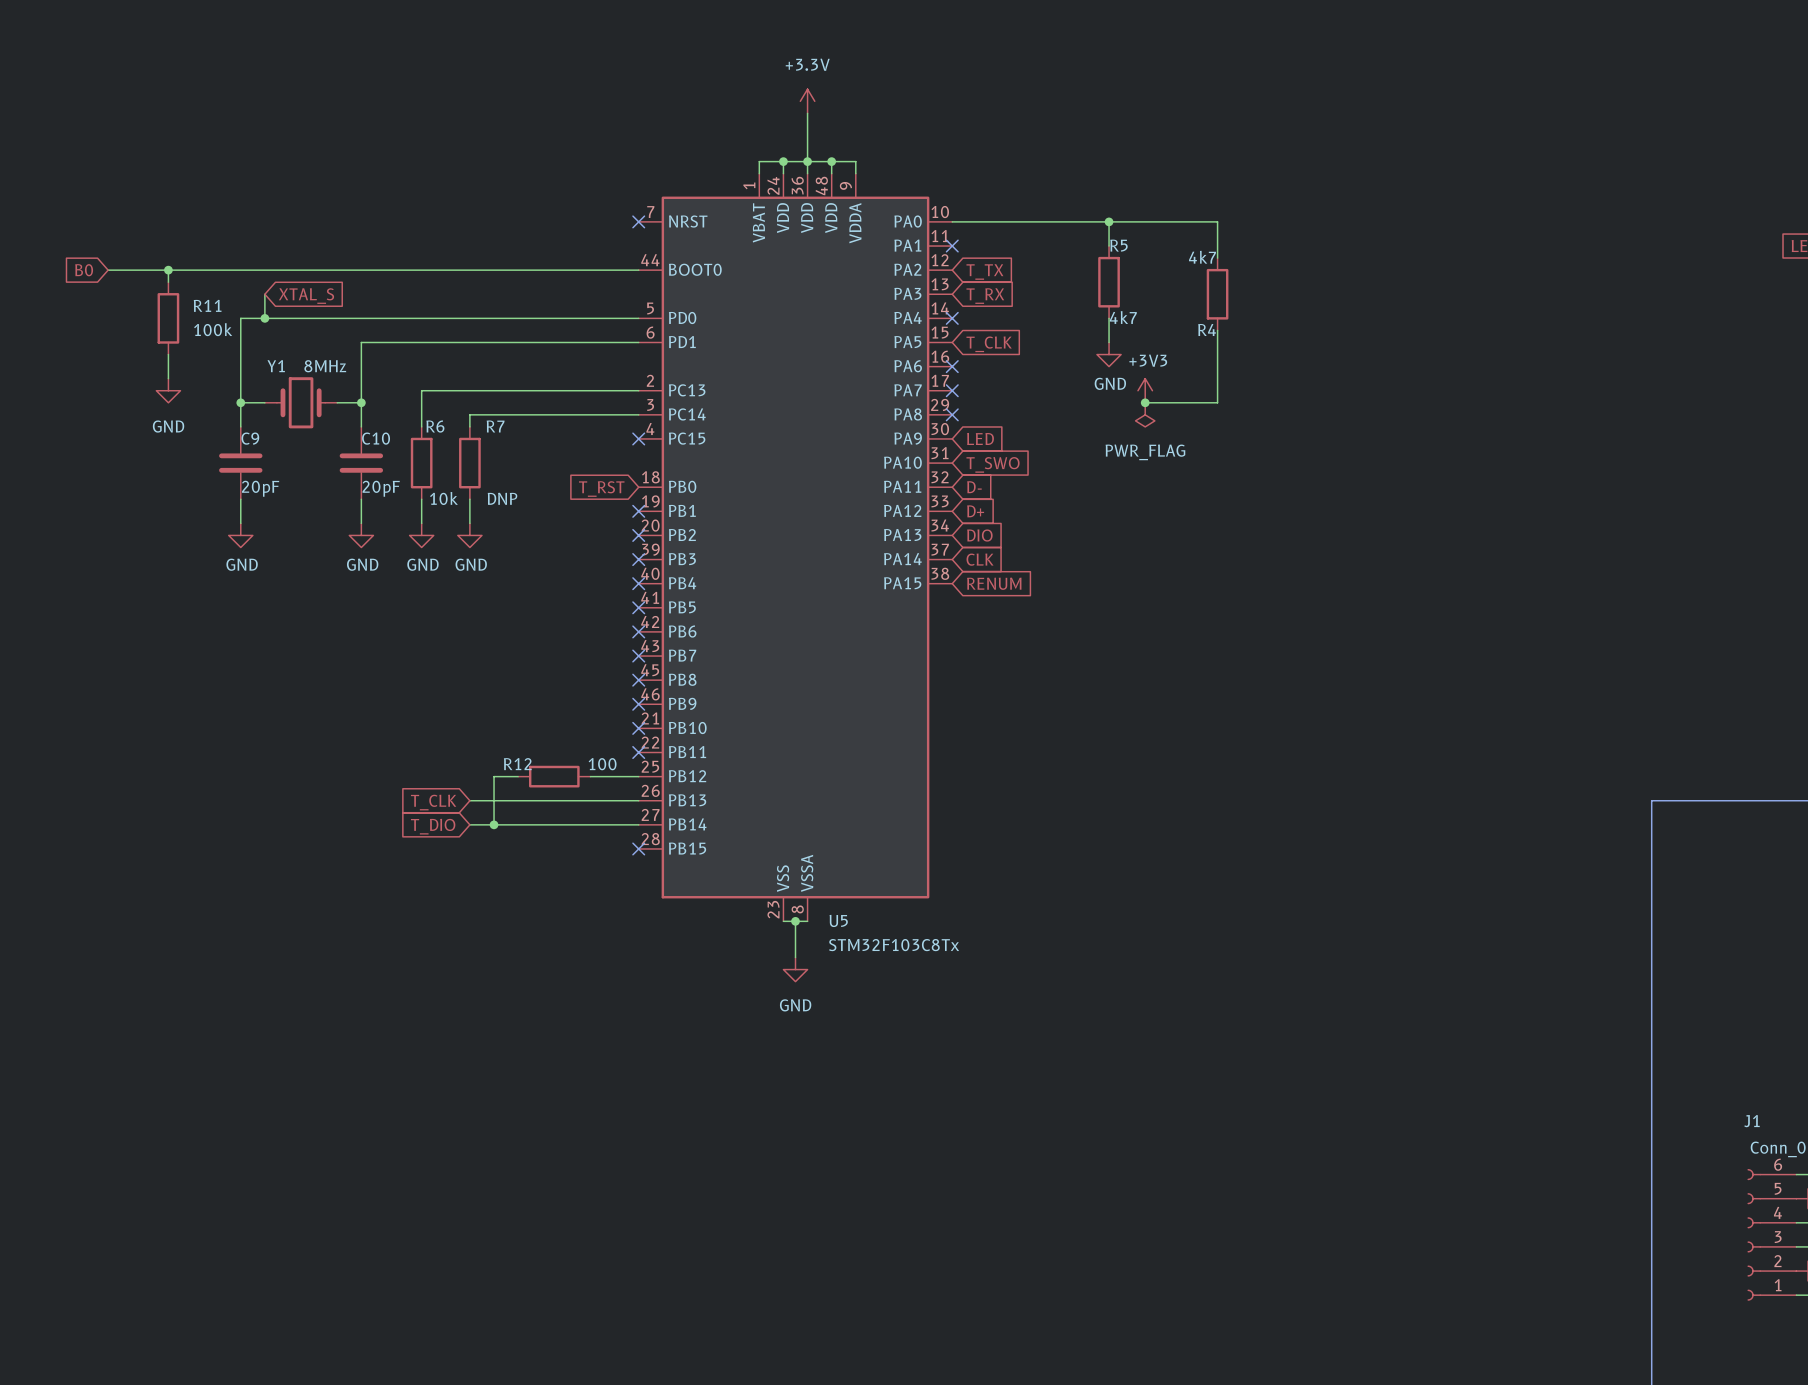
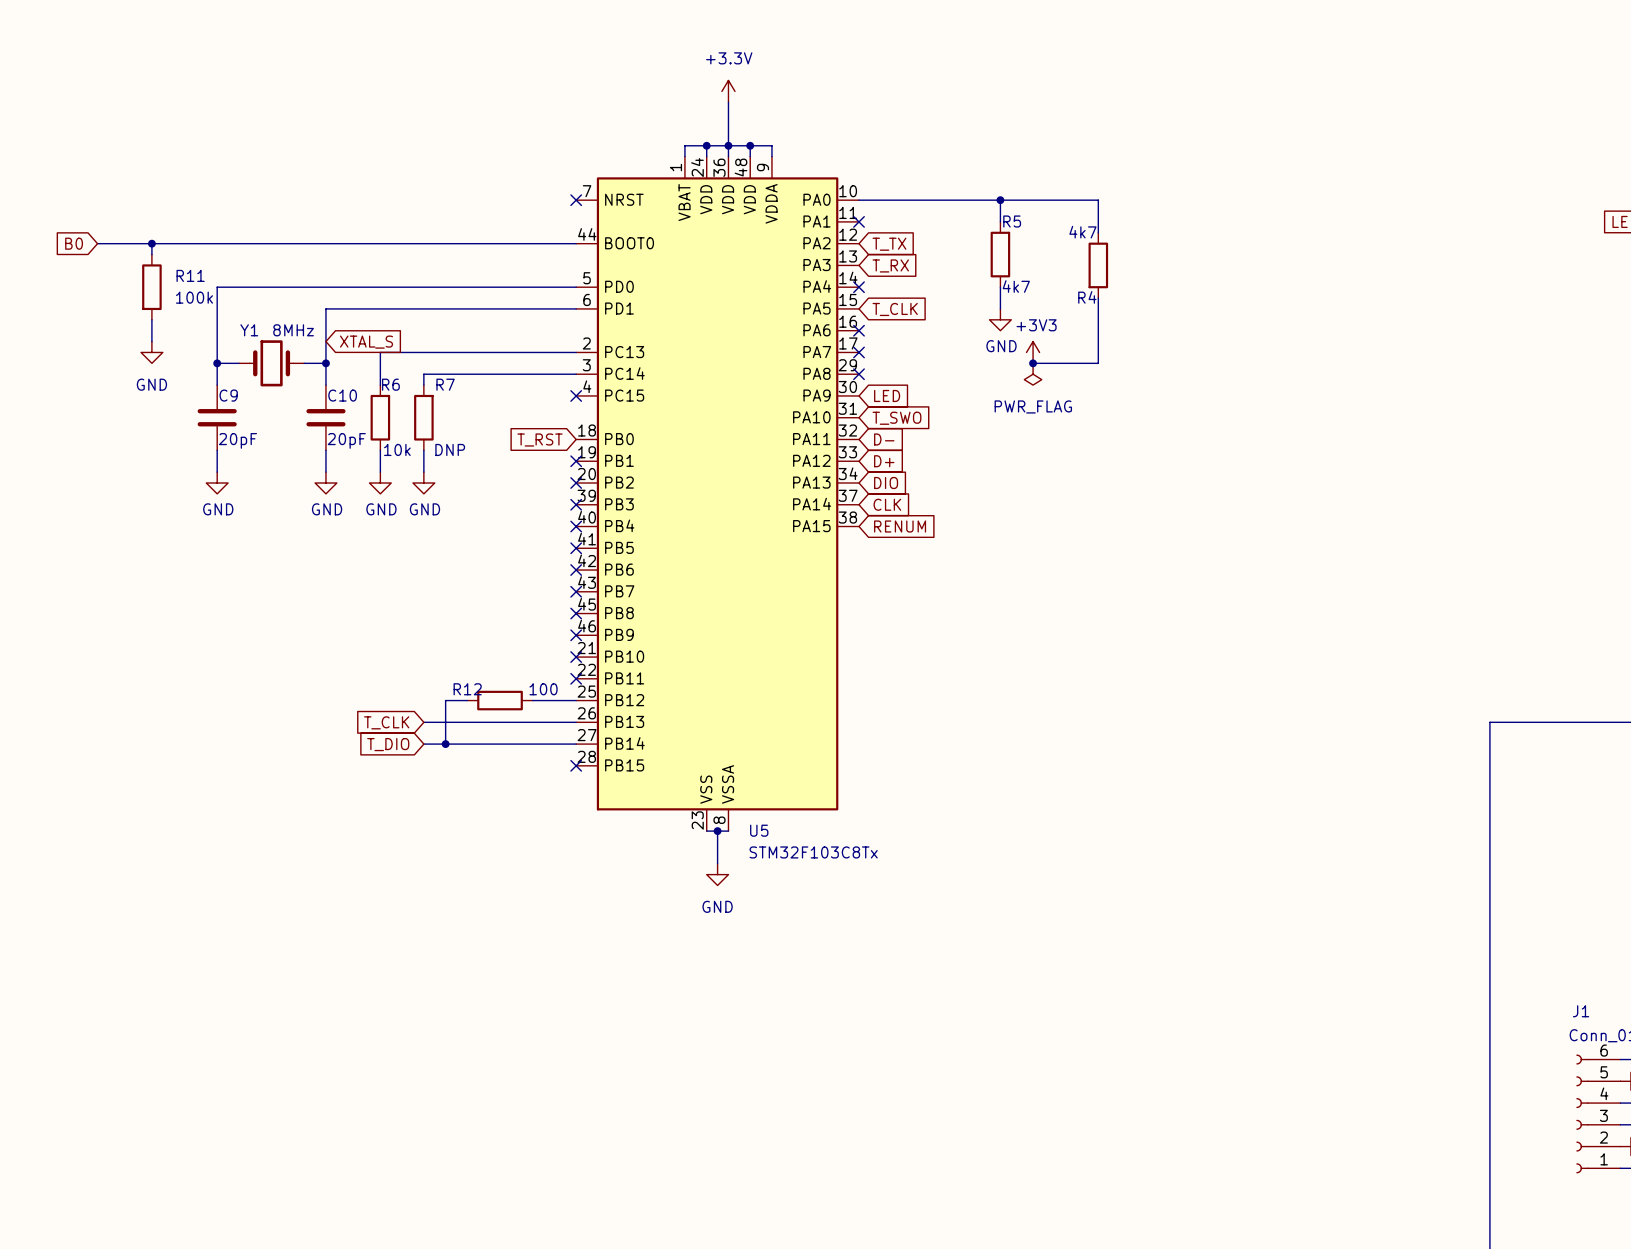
wire: (264, 294) (264, 318) -> none
global label position: XTAL_S (306, 296) -> XTAL_S (366, 342)
junction: (264, 318) -> none

